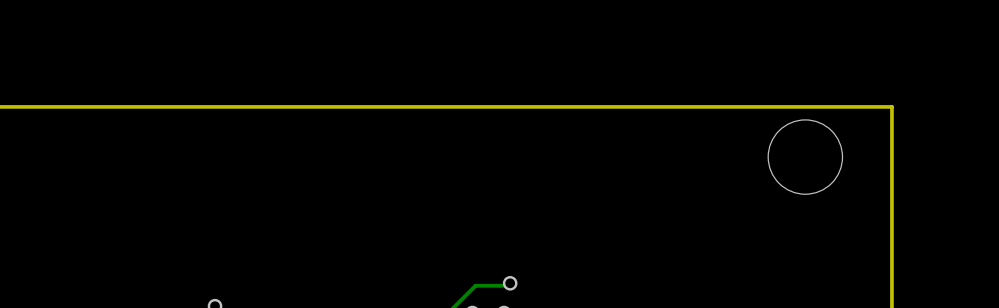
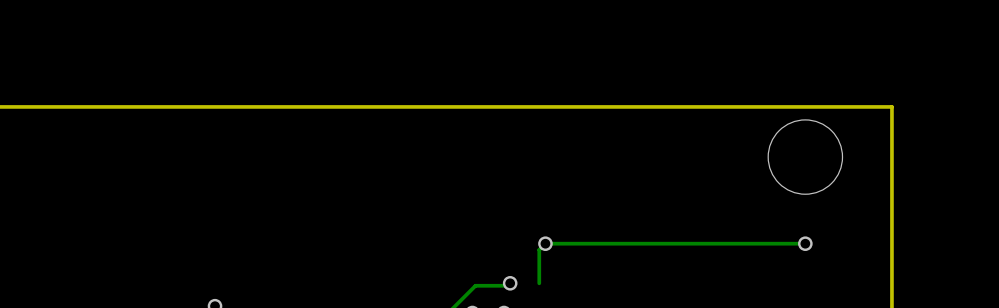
via: none -> (545, 243)
track: none -> (805, 243) (545, 243) (539, 249) (539, 283)
via: none -> (805, 243)

